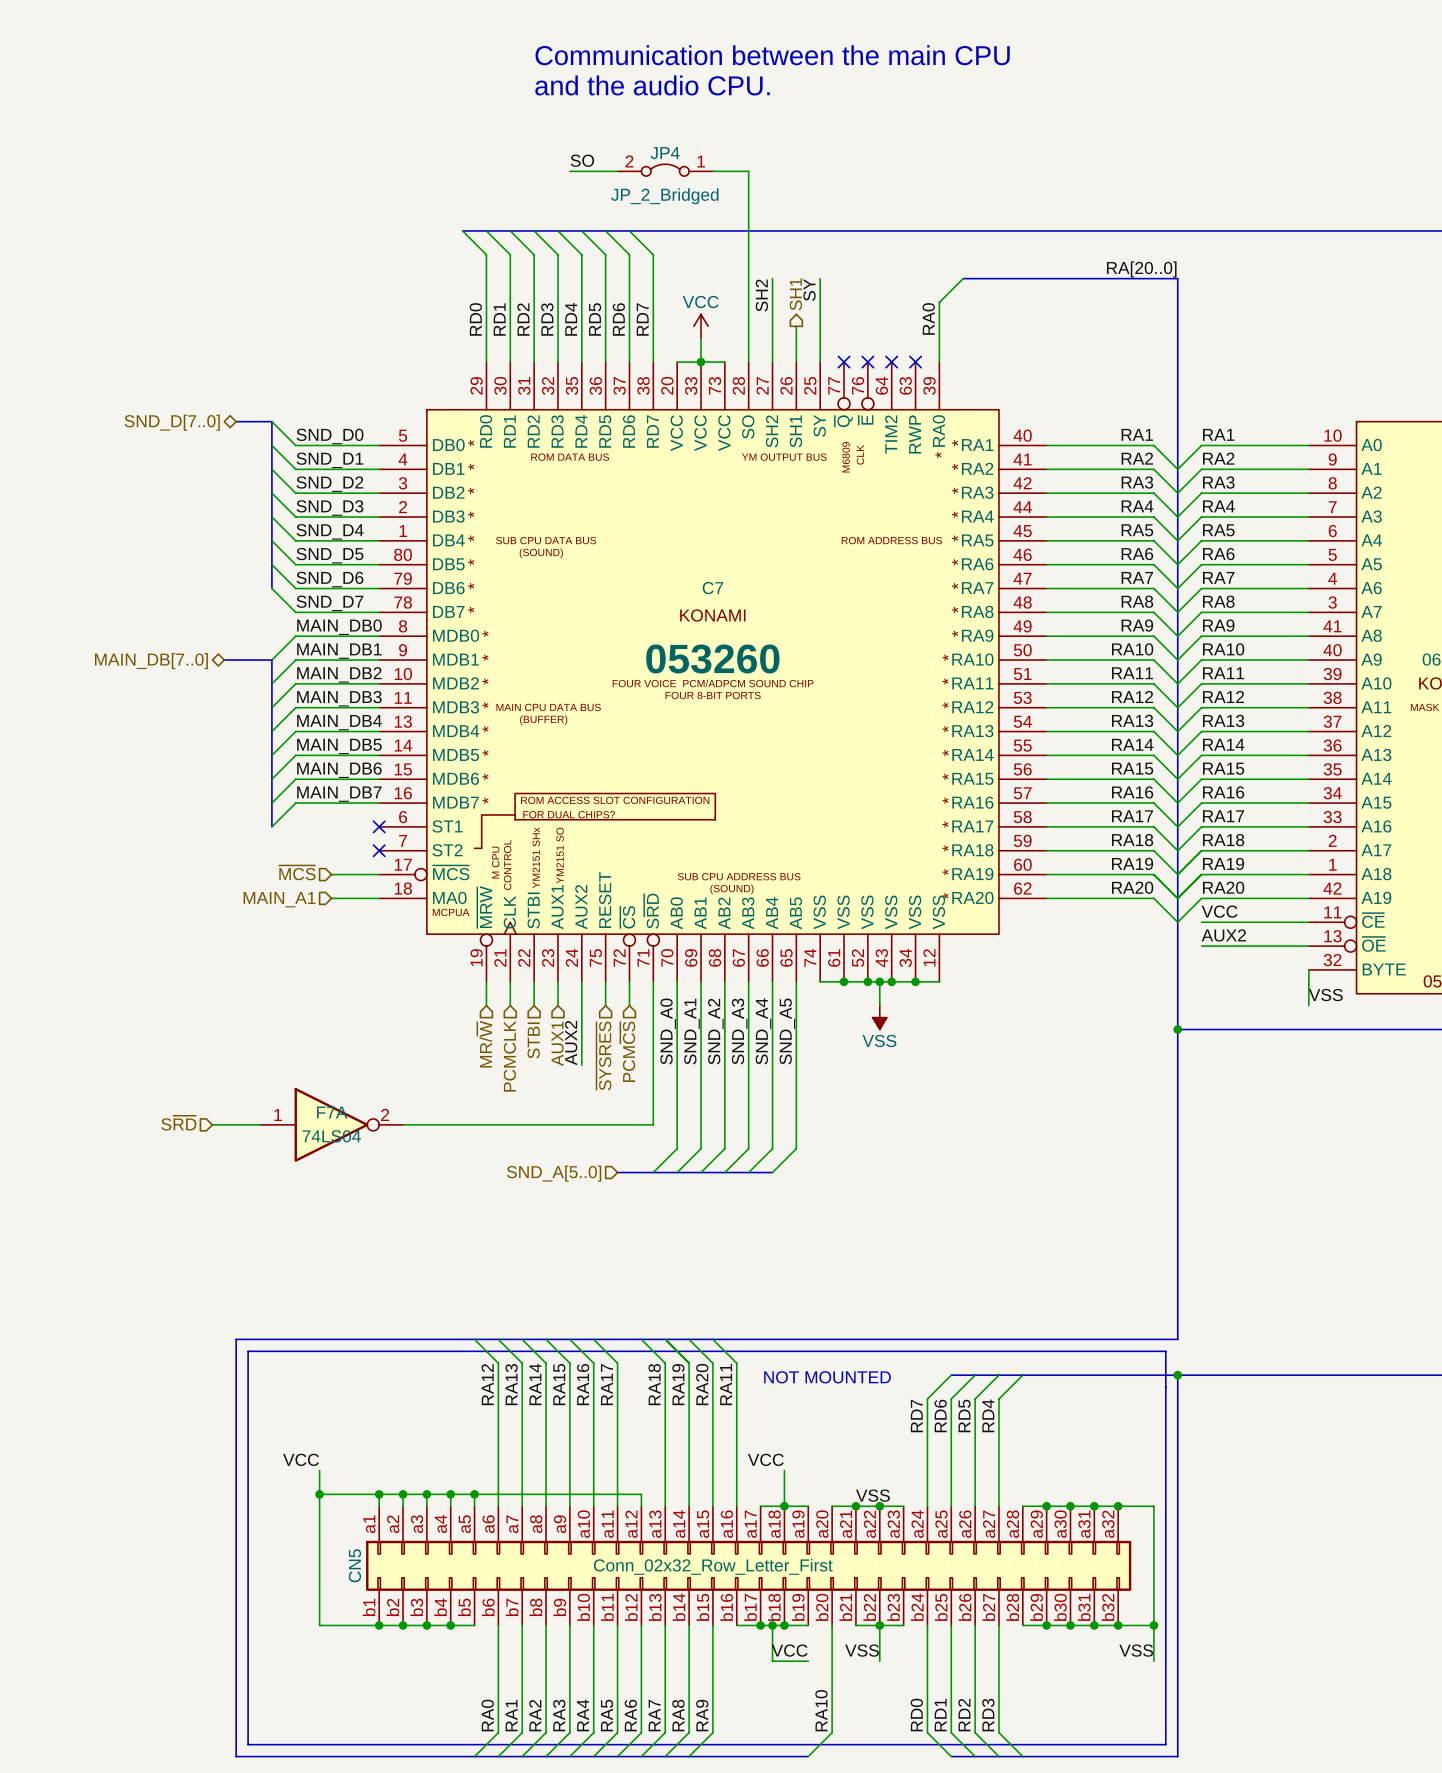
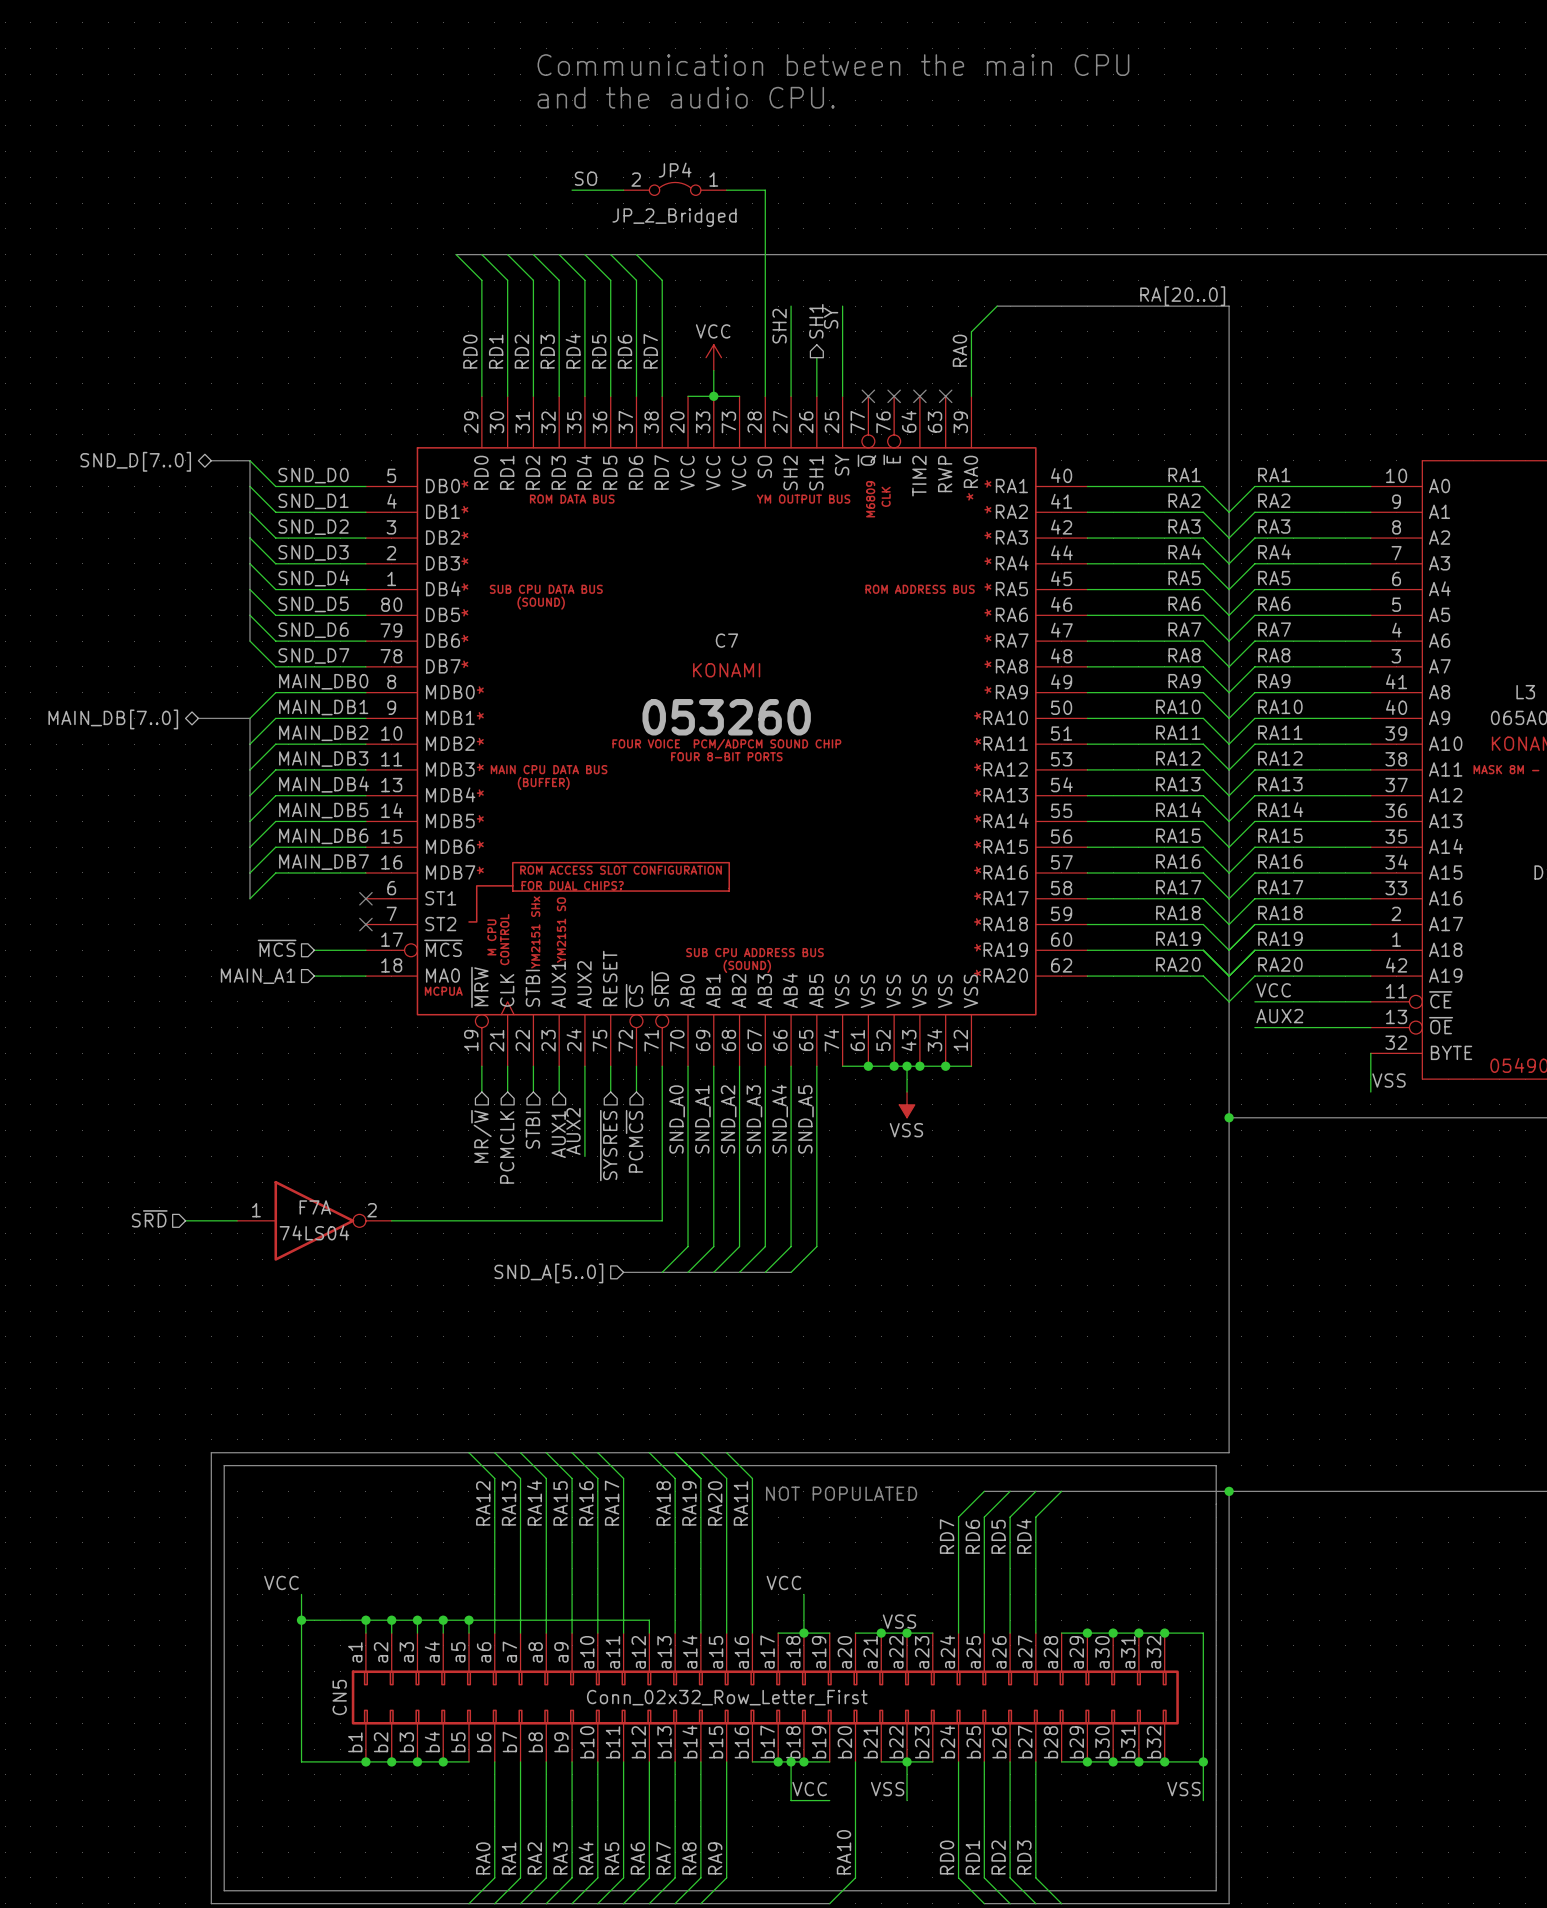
text: NOT MOUNTED (827, 1377) -> NOT POPULATED (841, 1493)

